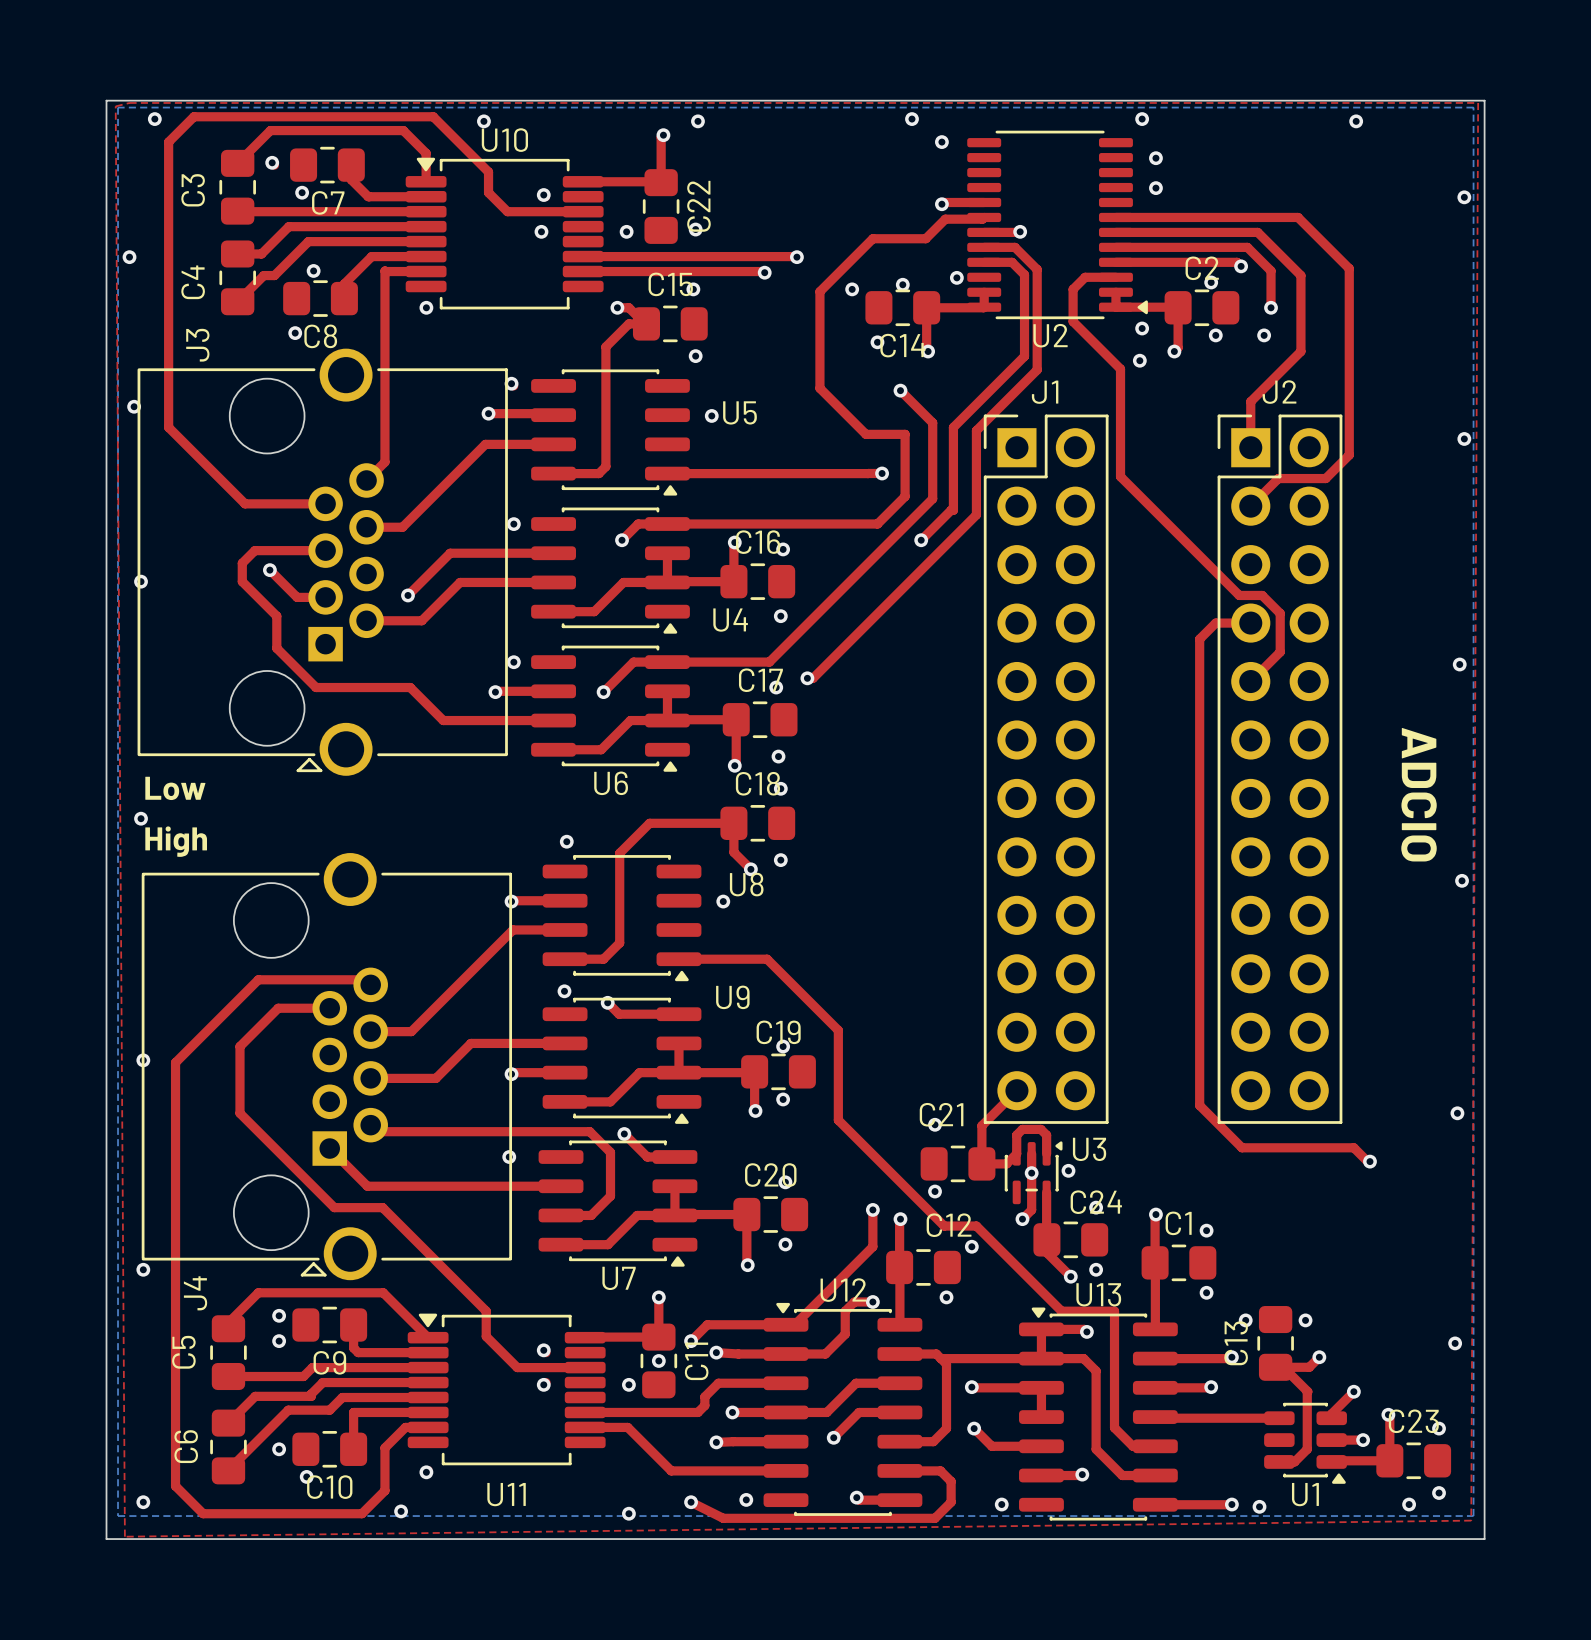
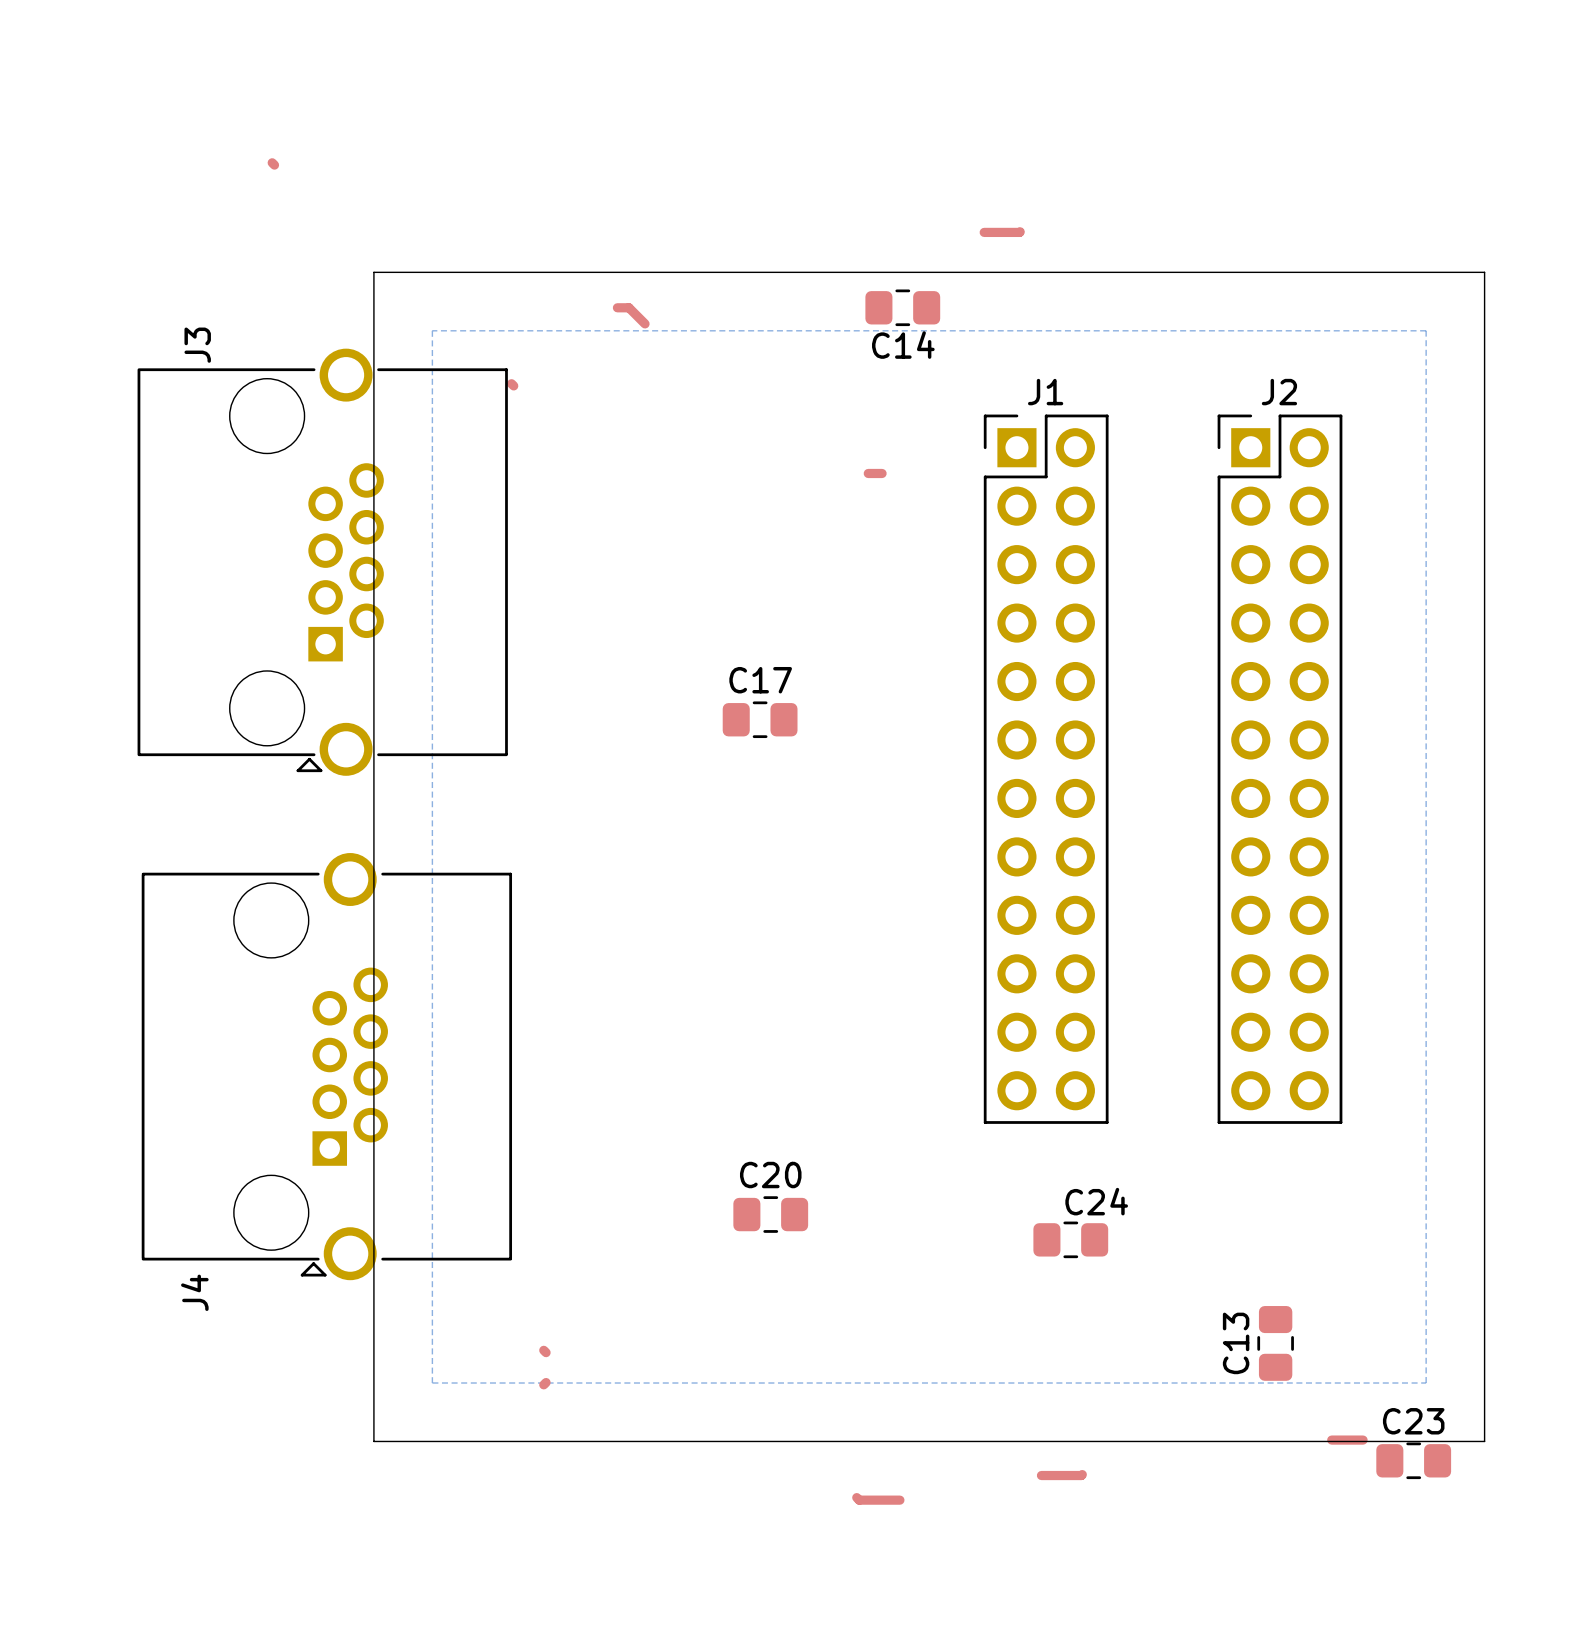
top zone outline: (129, 102) (1478, 102) (1471, 1520) (124, 1536) (115, 106) (129, 102) -> none
bottom zone outline: (118, 107) (1473, 107) (1473, 1516) (118, 1516) (118, 107) -> (432, 330) (432, 1383) (1426, 1383) (1426, 330) (432, 330)
via: (154, 119) -> none
via: (912, 119) -> none
via: (1142, 119) -> none
via: (483, 121) -> none
via: (697, 121) -> none
via: (1356, 121) -> none
top track: (663, 135) (661, 137) (661, 182) (583, 181) -> none
via: (663, 135) -> none
via: (941, 142) -> none
via: (1155, 158) -> none
via: (272, 162) -> none
top track: (237, 163) (270, 130) (403, 130) (426, 153) (426, 181) -> none
C7: (327, 165) -> none
top track: (351, 165) (351, 179) (368, 196) (426, 196) -> none
C3: (237, 187) -> none
via: (1155, 188) -> none
via: (302, 192) -> none
via: (543, 195) -> none
via: (1464, 197) -> none
top track: (984, 202) (943, 202) (941, 204) -> none
via: (941, 204) -> none
C22: (661, 206) -> none
top track: (237, 211) (426, 211) -> none
top track: (583, 211) (507, 211) (488, 192) (488, 172) (433, 116) (193, 116) (168, 142) (168, 427) (245, 503) (325, 503) -> none
top track: (984, 217) (982, 219) (945, 219) (925, 238) (872, 238) (819, 291) (819, 388) (865, 434) (905, 434) (905, 496) (877, 524) (638, 524) (622, 540) -> none
top track: (1115, 217) (1298, 217) (1349, 268) (1349, 455) (1325, 478) (1278, 478) (1250, 506) -> none
U2: (1057, 224) -> none
top track: (426, 226) (288, 226) (261, 253) (237, 253) -> none
via: (695, 229) -> none
via: (541, 231) -> none
via: (626, 231) -> none
via: (1020, 231) -> none
top track: (1115, 232) (1257, 232) (1300, 275) (1300, 351) (1250, 401) (1250, 447) -> none
U10: (504, 233) -> none
top track: (426, 241) (308, 241) (274, 275) (263, 275) (237, 301) -> none
top track: (984, 247) (1014, 247) (1037, 269) (1037, 369) (976, 430) (976, 514) (813, 678) (807, 678) -> none
top track: (1115, 247) (1247, 247) (1271, 270) (1271, 307) -> none
top track: (426, 256) (371, 256) (344, 283) (344, 298) -> none
top track: (583, 256) (796, 257) -> none
via: (129, 257) -> none
via: (796, 257) -> none
top track: (984, 262) (1012, 262) (1024, 274) (1024, 356) (953, 427) (953, 510) (951, 510) (921, 540) -> none
top track: (1115, 262) (1237, 262) (1241, 266) -> none
via: (1241, 266) -> none
via: (313, 270) -> none
top track: (426, 271) (384, 270) (384, 462) (366, 480) -> none
top track: (583, 271) (764, 272) -> none
via: (764, 272) -> none
board edge: (1484, 272) (1484, 100) (106, 100) (106, 1539) (1484, 1539) (1484, 1441) -> (1484, 272) (373, 272) (373, 1441) (1484, 1441)
C4: (237, 277) -> none
via: (956, 277) -> none
top track: (1115, 277) (1085, 277) (1073, 289) (1073, 321) (1120, 369) (1120, 476) (1239, 595) (1262, 595) (1280, 613) (1280, 652) (1250, 681) -> none
via: (1211, 282) -> none
via: (902, 284) -> none
via: (693, 289) -> none
via: (852, 289) -> none
top track: (984, 292) (983, 307) (926, 307) (928, 351) -> none
top track: (1115, 292) (1115, 307) (1178, 307) (1178, 347) (1174, 351) -> none
C8: (320, 298) -> none
via: (426, 307) -> none
via: (617, 307) -> none
C2: (1201, 307) -> none
via: (1271, 307) -> none
top track: (646, 323) (628, 323) (605, 346) (605, 466) (598, 473) (553, 473) -> none
C15: (670, 323) -> none
via: (1142, 328) -> none
via: (295, 333) -> none
via: (1215, 335) -> none
via: (1264, 335) -> none
via: (877, 342) -> none
via: (928, 351) -> none
via: (1174, 351) -> none
via: (695, 356) -> none
via: (1139, 360) -> none
via: (511, 383) -> none
top track: (900, 390) (932, 422) (932, 498) (769, 662) (633, 662) (603, 692) -> none
via: (900, 390) -> none
via: (134, 406) -> none
top track: (488, 413) (553, 415) -> none
via: (488, 413) -> none
via: (711, 415) -> none
U5: (610, 432) -> none
via: (1464, 438) -> none
top track: (553, 444) (485, 444) (402, 527) (366, 527) -> none
top track: (667, 473) (868, 473) -> none
via: (882, 473) -> none
via: (513, 524) -> none
via: (622, 540) -> none
via: (921, 540) -> none
top track: (734, 542) (733, 581) (667, 582) -> none
via: (734, 542) -> none
via: (783, 549) -> none
top track: (325, 550) (254, 550) (242, 563) (242, 581) (276, 616) (276, 648) (316, 687) (410, 687) (443, 720) (553, 720) -> none
top track: (553, 553) (450, 553) (407, 595) -> none
top track: (667, 553) (667, 582) -> none
top track: (269, 570) (297, 597) (325, 597) -> none
via: (269, 570) -> none
U4: (610, 570) -> none
via: (141, 581) -> none
C16: (757, 581) -> none
top track: (553, 582) (460, 582) (421, 620) (366, 620) -> none
top track: (667, 582) (623, 582) (594, 611) (553, 611) -> none
via: (407, 595) -> none
via: (780, 616) -> none
top track: (1250, 623) (1215, 623) (1199, 639) (1199, 1105) (1241, 1147) (1353, 1147) (1369, 1161) -> none
via: (513, 662) -> none
via: (1459, 664) -> none
via: (807, 678) -> none
via: (776, 687) -> none
top track: (553, 691) (495, 692) -> none
top track: (667, 691) (667, 720) -> none
via: (495, 692) -> none
via: (603, 692) -> none
U6: (610, 708) -> none
top track: (667, 720) (630, 720) (601, 749) (553, 749) -> none
top track: (667, 720) (736, 719) (734, 765) -> none
via: (778, 756) -> none
via: (734, 765) -> none
text: Low (175, 788) -> none
via: (780, 788) -> none
text: ADCIO (1419, 794) -> none
via: (141, 818) -> none
C18: (757, 823) -> none
text: High (176, 841) -> none
via: (566, 841) -> none
via: (780, 860) -> none
top track: (750, 869) (733, 852) (733, 823) (649, 823) (619, 853) (619, 942) (603, 959) (565, 959) -> none
via: (750, 869) -> none
via: (1462, 880) -> none
top track: (565, 900) (511, 901) -> none
via: (511, 901) -> none
via: (723, 901) -> none
U8: (622, 918) -> none
top track: (565, 929) (513, 929) (411, 1031) (370, 1031) -> none
top track: (678, 959) (767, 959) (838, 1030) (838, 1120) (944, 1226) (976, 1226) (1061, 1311) (1114, 1311) (1114, 1427) (1132, 1446) (1155, 1446) -> none
top track: (370, 984) (365, 979) (258, 979) (175, 1062) (175, 1486) (203, 1513) (361, 1513) (384, 1490) (384, 1447) (405, 1427) (428, 1427) -> none
via: (564, 991) -> none
top track: (607, 1002) (619, 1014) (678, 1014) -> none
via: (607, 1002) -> none
top track: (329, 1008) (278, 1008) (239, 1046) (239, 1113) (334, 1207) (382, 1207) (486, 1311) (486, 1336) (517, 1367) (585, 1367) -> none
top track: (565, 1043) (470, 1043) (435, 1078) (370, 1078) -> none
top track: (678, 1043) (678, 1072) -> none
via: (783, 1046) -> none
via: (143, 1060) -> none
U9: (622, 1060) -> none
C19: (778, 1071) -> none
top track: (565, 1072) (511, 1074) -> none
via: (511, 1074) -> none
top track: (1016, 1090) (981, 1125) (981, 1163) (1006, 1163) (1016, 1153) (1016, 1135) (1022, 1129) (1040, 1129) (1046, 1135) (1046, 1153) -> none
via: (783, 1099) -> none
top track: (565, 1101) (610, 1101) (639, 1072) (754, 1071) (755, 1110) -> none
via: (755, 1110) -> none
via: (1457, 1113) -> none
via: (935, 1124) -> none
top track: (370, 1125) (377, 1131) (589, 1131) (610, 1152) (610, 1196) (591, 1215) (561, 1215) -> none
top track: (624, 1133) (647, 1157) (674, 1157) -> none
via: (624, 1133) -> none
top track: (329, 1148) (367, 1186) (561, 1186) -> none
top track: (1031, 1153) (1031, 1209) (1022, 1219) -> none
via: (509, 1157) -> none
via: (1369, 1161) -> none
C21: (958, 1163) -> none
via: (1068, 1170) -> none
U3: (1033, 1172) -> none
via: (1031, 1173) -> none
via: (785, 1182) -> none
top track: (674, 1186) (674, 1215) -> none
via: (935, 1191) -> none
top track: (1046, 1192) (1046, 1239) -> none
U7: (617, 1203) -> none
via: (1096, 1207) -> none
top track: (872, 1209) (872, 1246) (794, 1325) -> none
via: (872, 1209) -> none
top track: (1155, 1214) (1155, 1262) -> none
via: (1155, 1214) -> none
top track: (674, 1215) (637, 1215) (607, 1244) (561, 1244) -> none
top track: (674, 1215) (746, 1214) (747, 1265) -> none
top track: (900, 1219) (899, 1267) -> none
via: (900, 1219) -> none
via: (1022, 1219) -> none
via: (1206, 1230) -> none
top track: (1046, 1239) (1046, 1252) (1070, 1276) -> none
via: (785, 1244) -> none
via: (971, 1246) -> none
C1: (1178, 1262) -> none
top track: (1155, 1263) (1155, 1329) -> none
via: (747, 1265) -> none
top track: (899, 1267) (899, 1324) -> none
C12: (923, 1267) -> none
via: (143, 1269) -> none
via: (1096, 1269) -> none
via: (1070, 1276) -> none
via: (1206, 1292) -> none
top track: (658, 1297) (658, 1337) (585, 1337) -> none
via: (658, 1297) -> none
via: (946, 1297) -> none
top track: (872, 1302) (854, 1302) (845, 1311) (845, 1334) (825, 1354) (716, 1352) -> none
via: (872, 1302) -> none
via: (279, 1315) -> none
via: (1245, 1320) -> none
via: (1305, 1320) -> none
top track: (794, 1324) (707, 1324) (691, 1341) -> none
C9: (329, 1325) -> none
top track: (353, 1325) (353, 1348) (358, 1352) (428, 1352) -> none
top track: (228, 1328) (228, 1322) (258, 1292) (383, 1292) (428, 1337) -> none
top track: (1086, 1331) (1084, 1329) (1041, 1329) (1041, 1358) -> none
via: (1086, 1331) -> none
via: (279, 1341) -> none
via: (691, 1341) -> none
via: (1455, 1343) -> none
via: (543, 1350) -> none
C5: (228, 1352) -> none
via: (716, 1352) -> none
top track: (899, 1354) (936, 1354) (946, 1364) (946, 1428) (933, 1441) (899, 1441) -> none
top track: (1231, 1357) (1155, 1358) -> none
via: (1231, 1357) -> none
top track: (1319, 1357) (1309, 1367) (1275, 1367) -> none
via: (1319, 1357) -> none
top track: (940, 1358) (1083, 1358) (1096, 1371) (1096, 1449) (1122, 1475) (1155, 1475) -> none
C11: (658, 1360) -> none
via: (658, 1360) -> none
top track: (428, 1367) (312, 1367) (303, 1376) (228, 1376) -> none
top track: (1283, 1367) (1307, 1391) (1307, 1449) (1294, 1461) (1279, 1461) -> none
top track: (428, 1382) (322, 1382) (311, 1396) (255, 1396) (228, 1423) -> none
top track: (785, 1383) (718, 1383) (704, 1396) (704, 1405) (697, 1412) (585, 1412) -> none
top track: (899, 1383) (856, 1383) (826, 1412) (732, 1412) -> none
via: (543, 1384) -> none
via: (628, 1384) -> none
top track: (971, 1387) (1041, 1387) (1041, 1417) -> none
via: (971, 1387) -> none
top track: (1211, 1387) (1155, 1387) -> none
via: (1211, 1387) -> none
U11: (506, 1389) -> none
top track: (1353, 1391) (1331, 1413) (1331, 1418) -> none
via: (1353, 1391) -> none
top track: (428, 1397) (342, 1397) (329, 1410) (288, 1410) (228, 1470) -> none
U12: (842, 1409) -> none
top track: (428, 1412) (353, 1412) (353, 1449) -> none
via: (732, 1412) -> none
top track: (899, 1412) (859, 1412) (833, 1437) -> none
U13: (1098, 1414) -> none
top track: (1388, 1414) (1389, 1460) (1331, 1461) -> none
via: (1388, 1414) -> none
top track: (1155, 1417) (1279, 1418) -> none
top track: (585, 1427) (627, 1427) (671, 1470) (785, 1470) -> none
top track: (974, 1428) (991, 1446) (1041, 1446) -> none
via: (974, 1428) -> none
via: (1439, 1428) -> none
via: (833, 1437) -> none
via: (1363, 1440) -> none
top track: (785, 1441) (716, 1442) -> none
via: (716, 1442) -> none
U1: (1305, 1443) -> none
C6: (228, 1446) -> none
via: (279, 1449) -> none
C10: (329, 1449) -> none
top track: (899, 1470) (940, 1470) (951, 1481) (951, 1502) (935, 1518) (723, 1518) (691, 1502) -> none
via: (426, 1472) -> none
via: (1082, 1474) -> none
via: (306, 1476) -> none
via: (1439, 1493) -> none
via: (856, 1497) -> none
via: (746, 1499) -> none
via: (143, 1502) -> none
via: (691, 1502) -> none
via: (1001, 1504) -> none
top track: (1155, 1504) (1231, 1504) -> none
via: (1231, 1504) -> none
via: (1409, 1504) -> none
via: (1259, 1506) -> none
via: (401, 1511) -> none
via: (628, 1513) -> none

